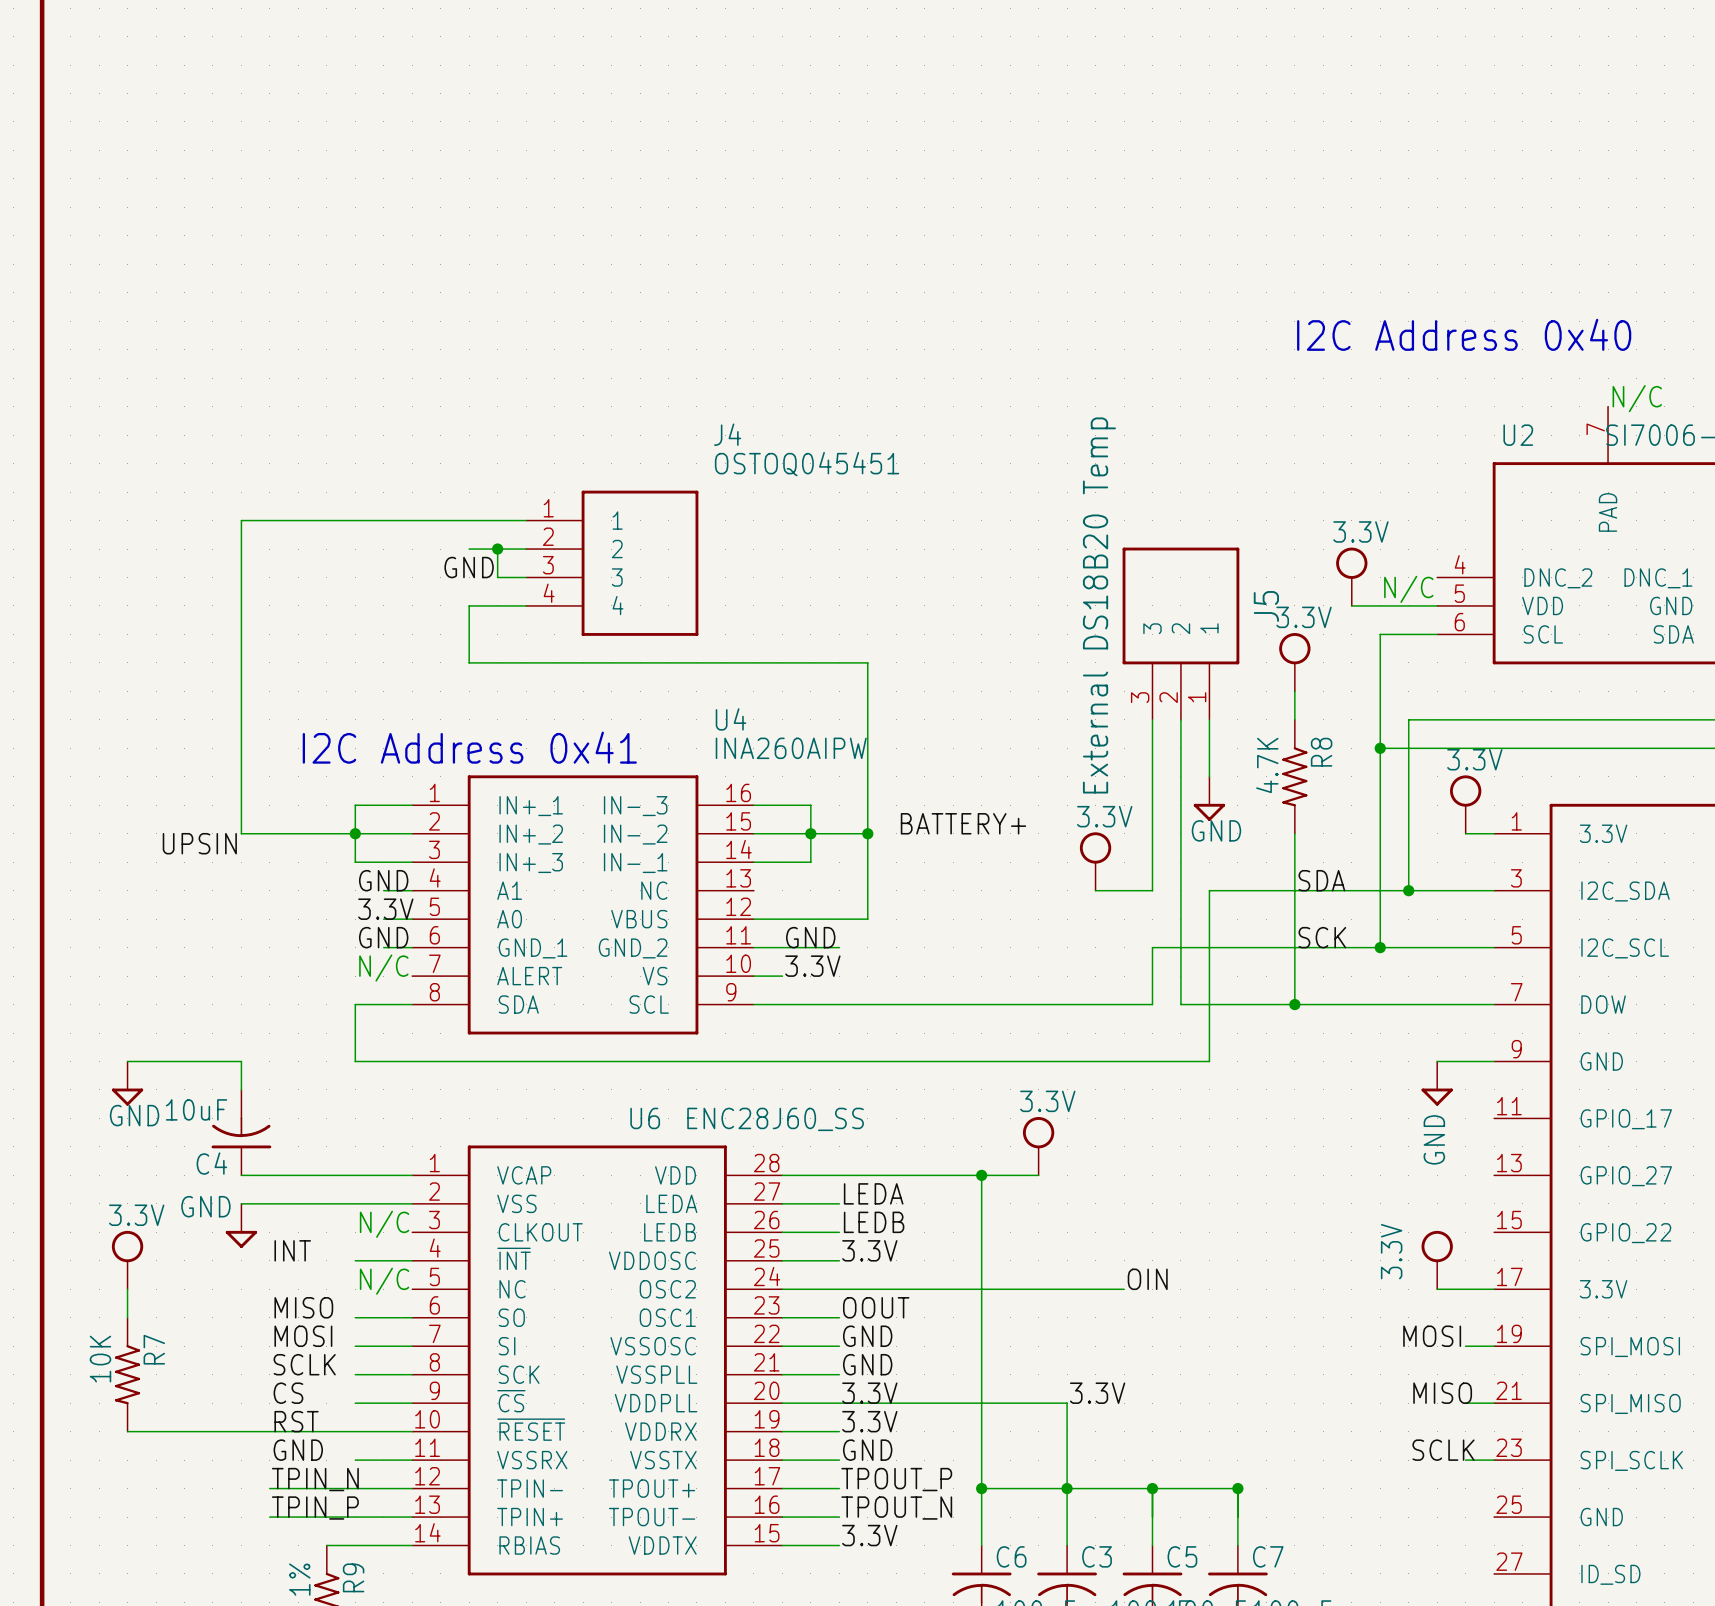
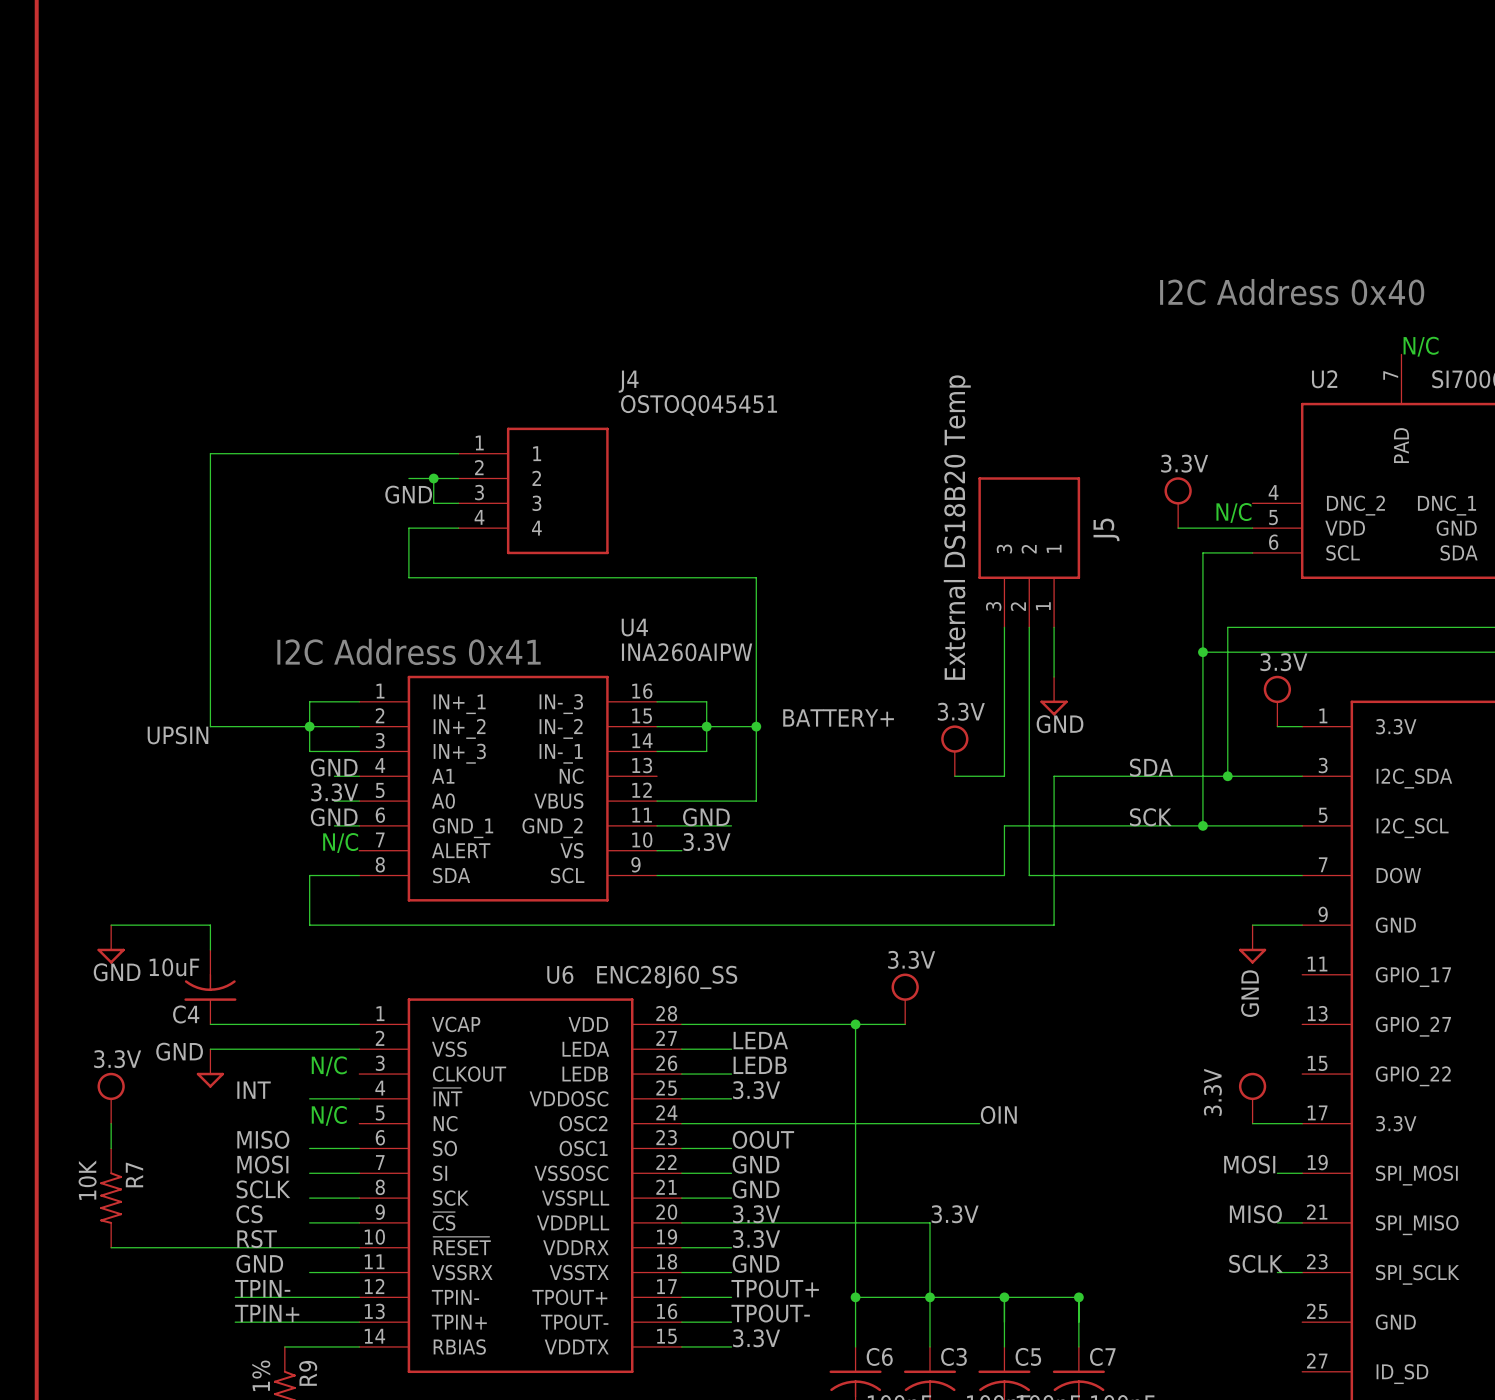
power symbol: 3.3V (1294, 662) -> none
wire: (1294, 691) (1294, 719) -> none
R8: 4.7K (1294, 776) -> none
wire: (1294, 833) (1294, 1004) -> none
junction: (1294, 1004) -> none
label: TPIN_N (315, 1479) -> TPIN- (262, 1288)
label: TPOUT_P (896, 1479) -> TPOUT+ (775, 1288)
label: TPIN_P (315, 1508) -> TPIN+ (267, 1313)
label: TPOUT_N (896, 1508) -> TPOUT- (770, 1313)

